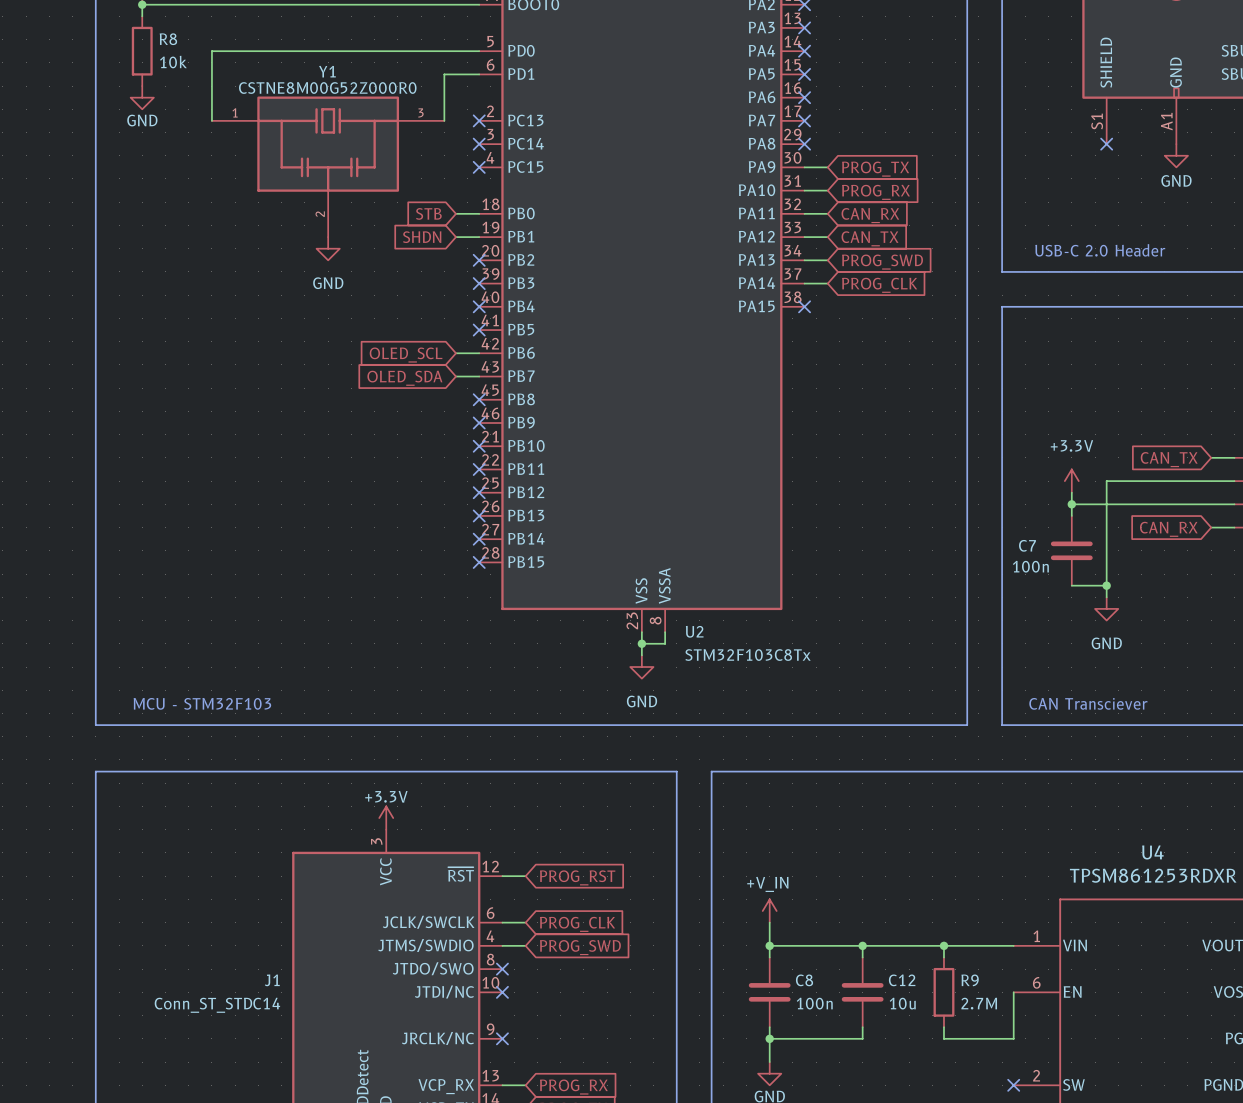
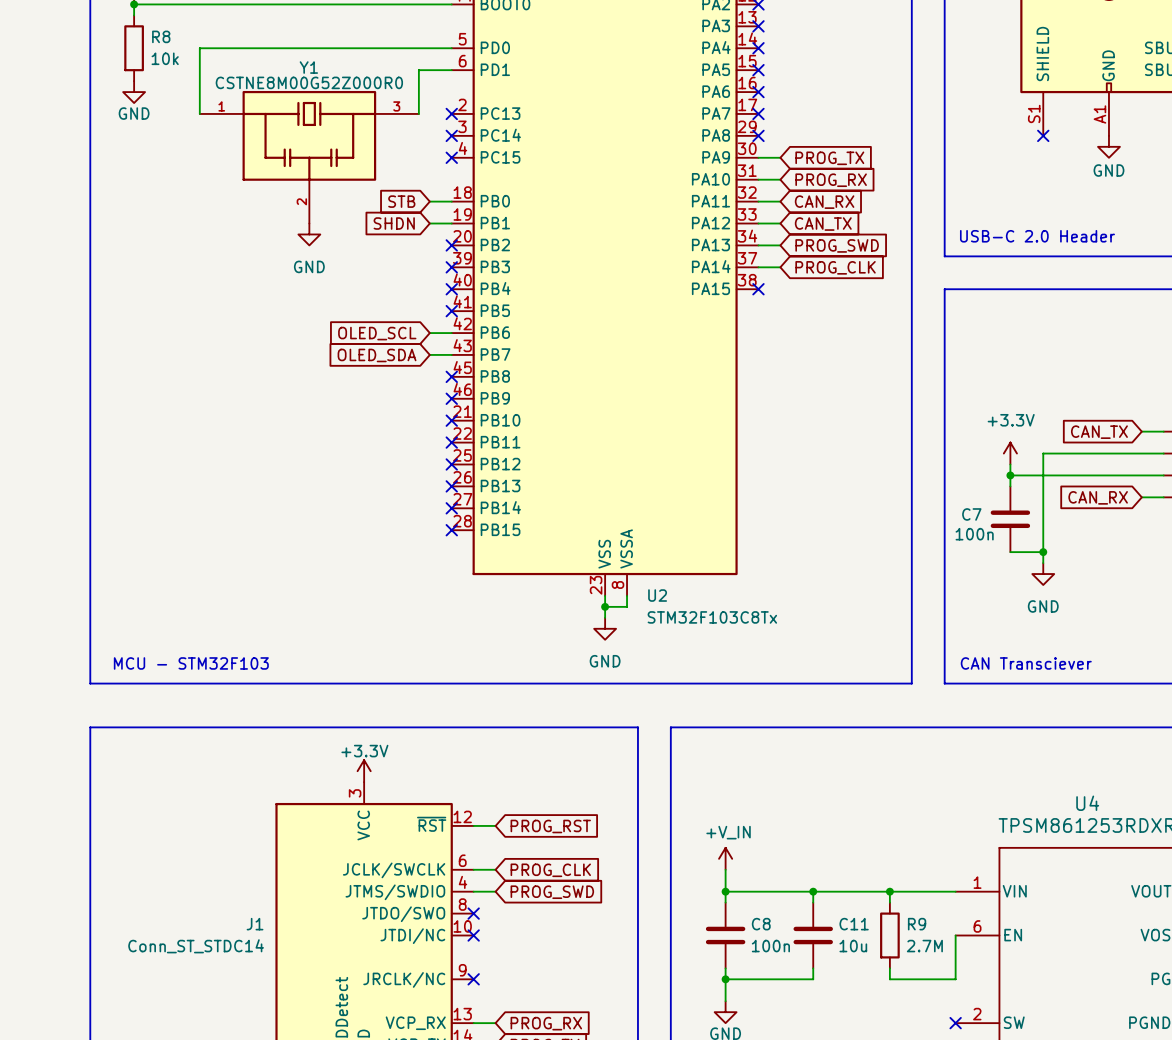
C12 name: C12 (902, 980) -> C11 (854, 924)

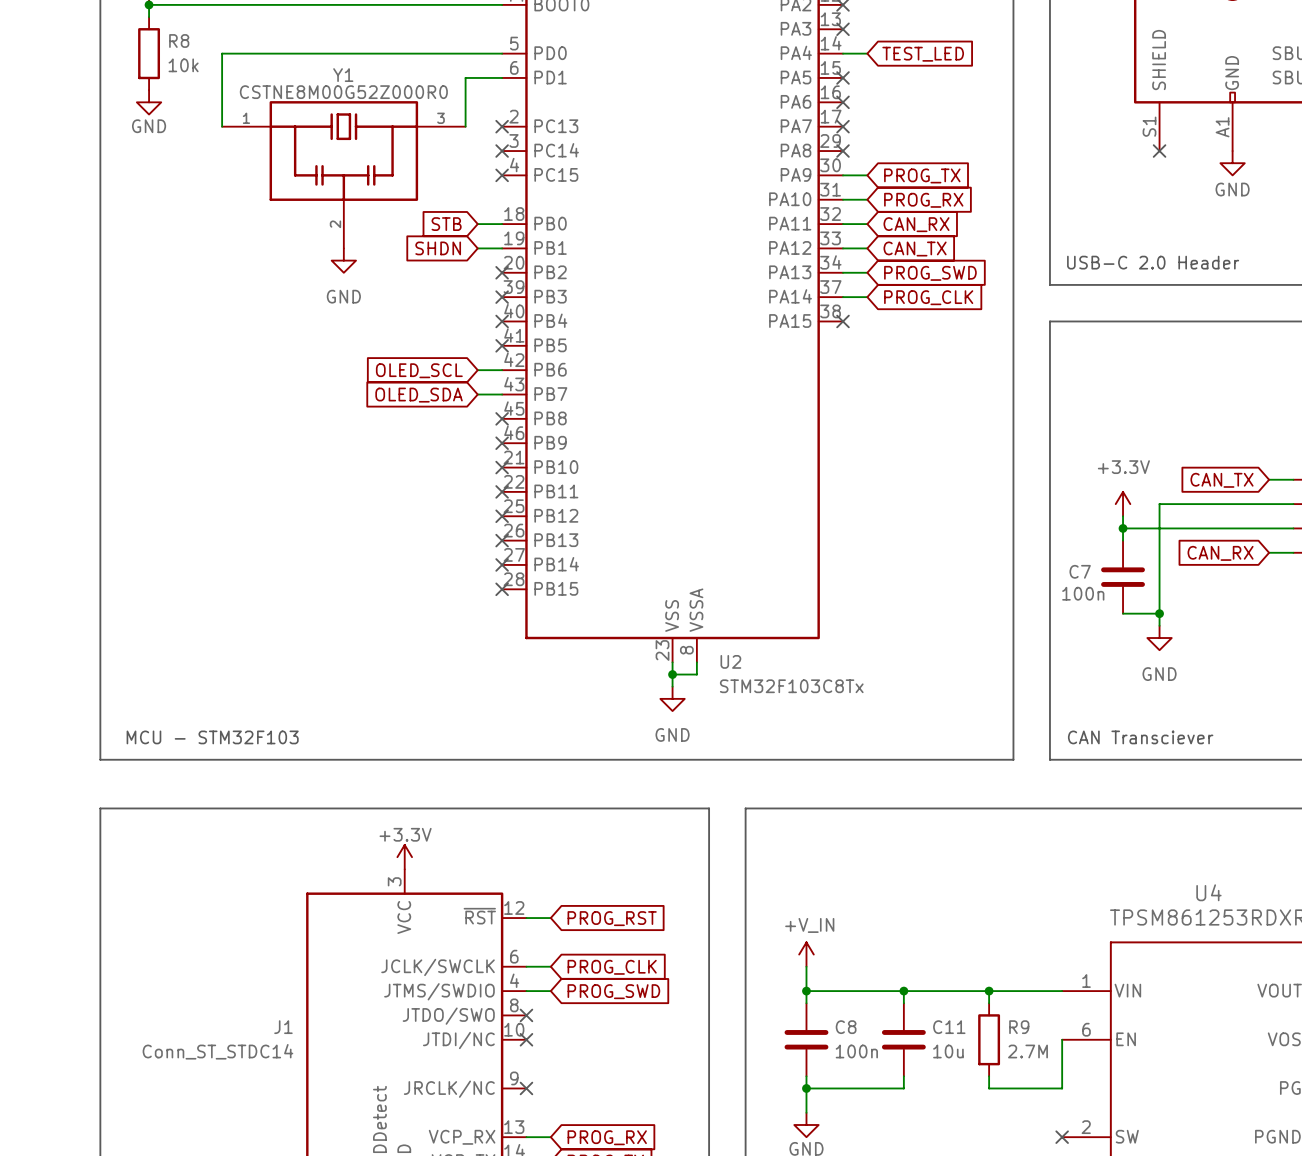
wire: none -> (843, 53) (867, 53)
no-connect mark: (758, 48) -> none
global label: none -> TEST_LED (923, 54)

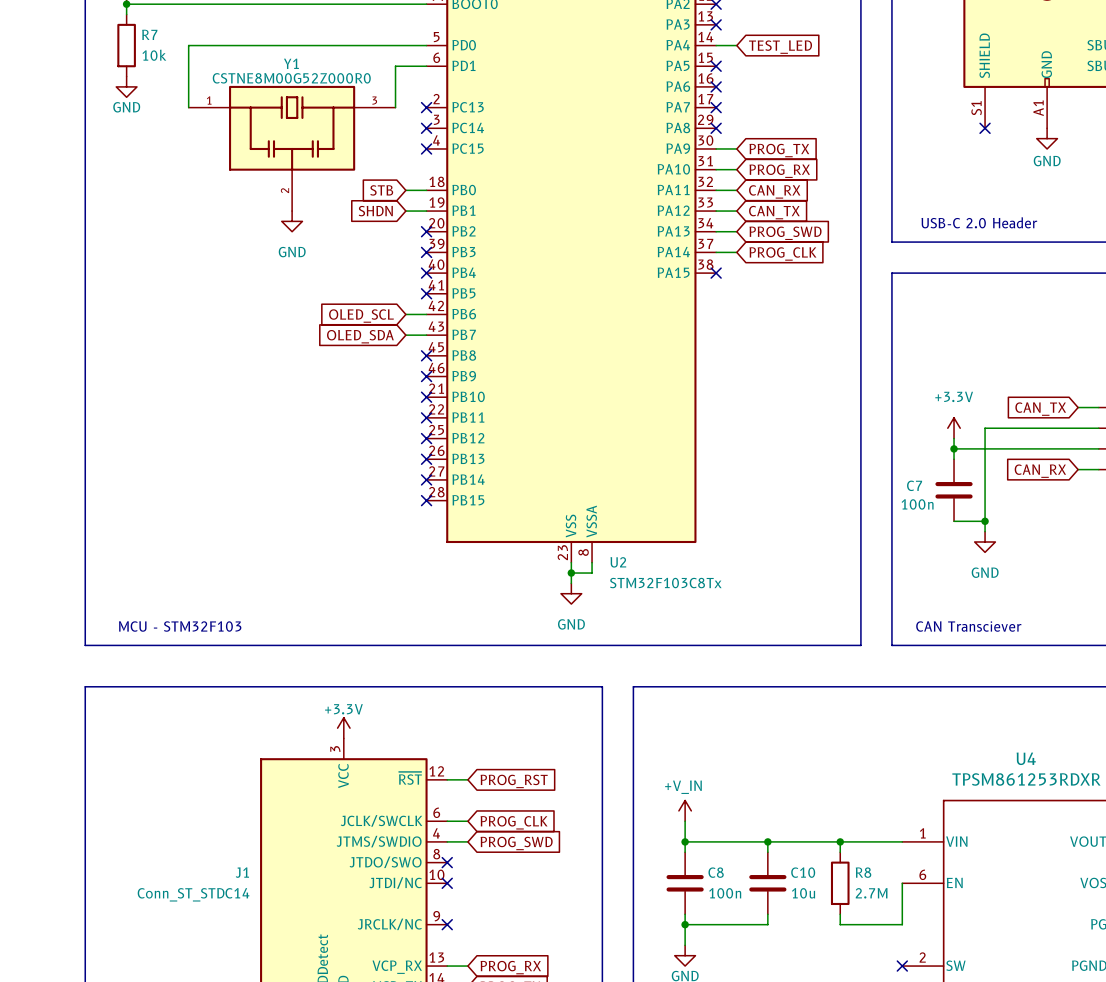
R8 name: R8 (179, 41) -> R7 (149, 34)
C11 name: C11 (949, 1027) -> C10 (803, 872)
R9 name: R9 (1019, 1027) -> R8 (863, 872)

